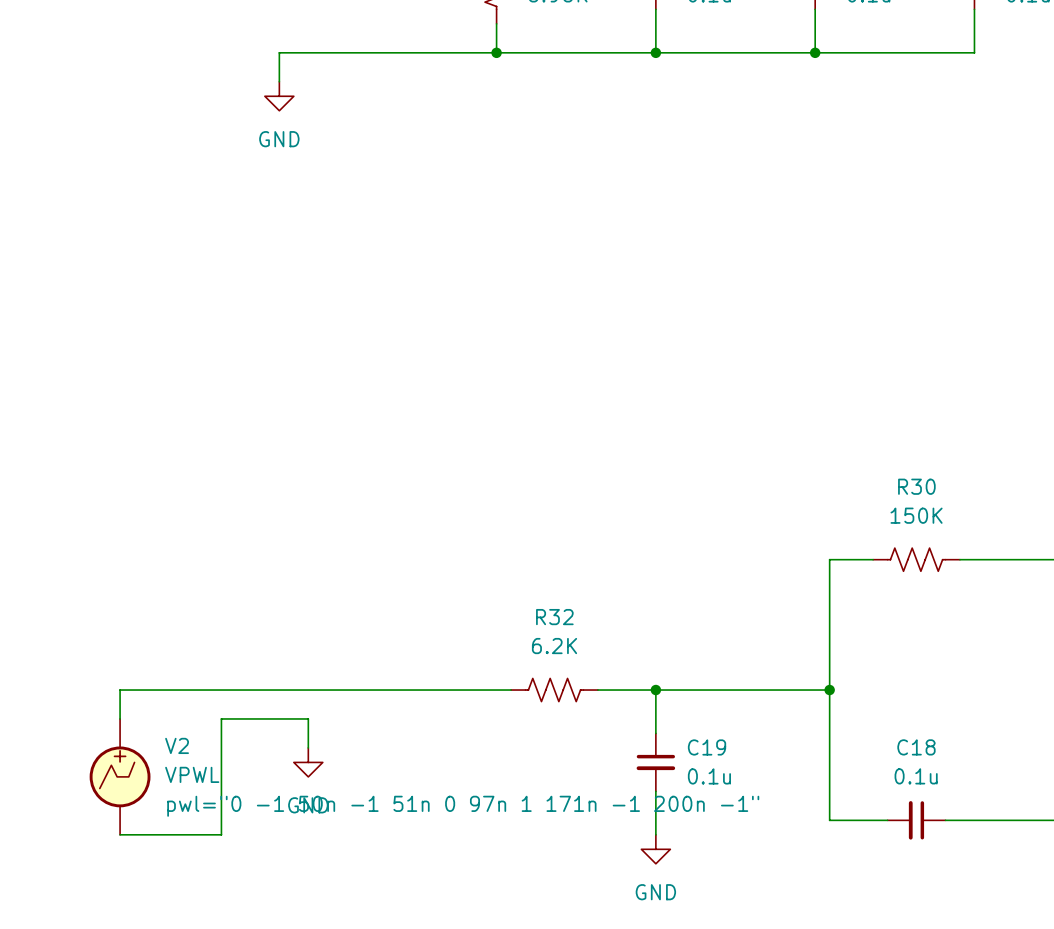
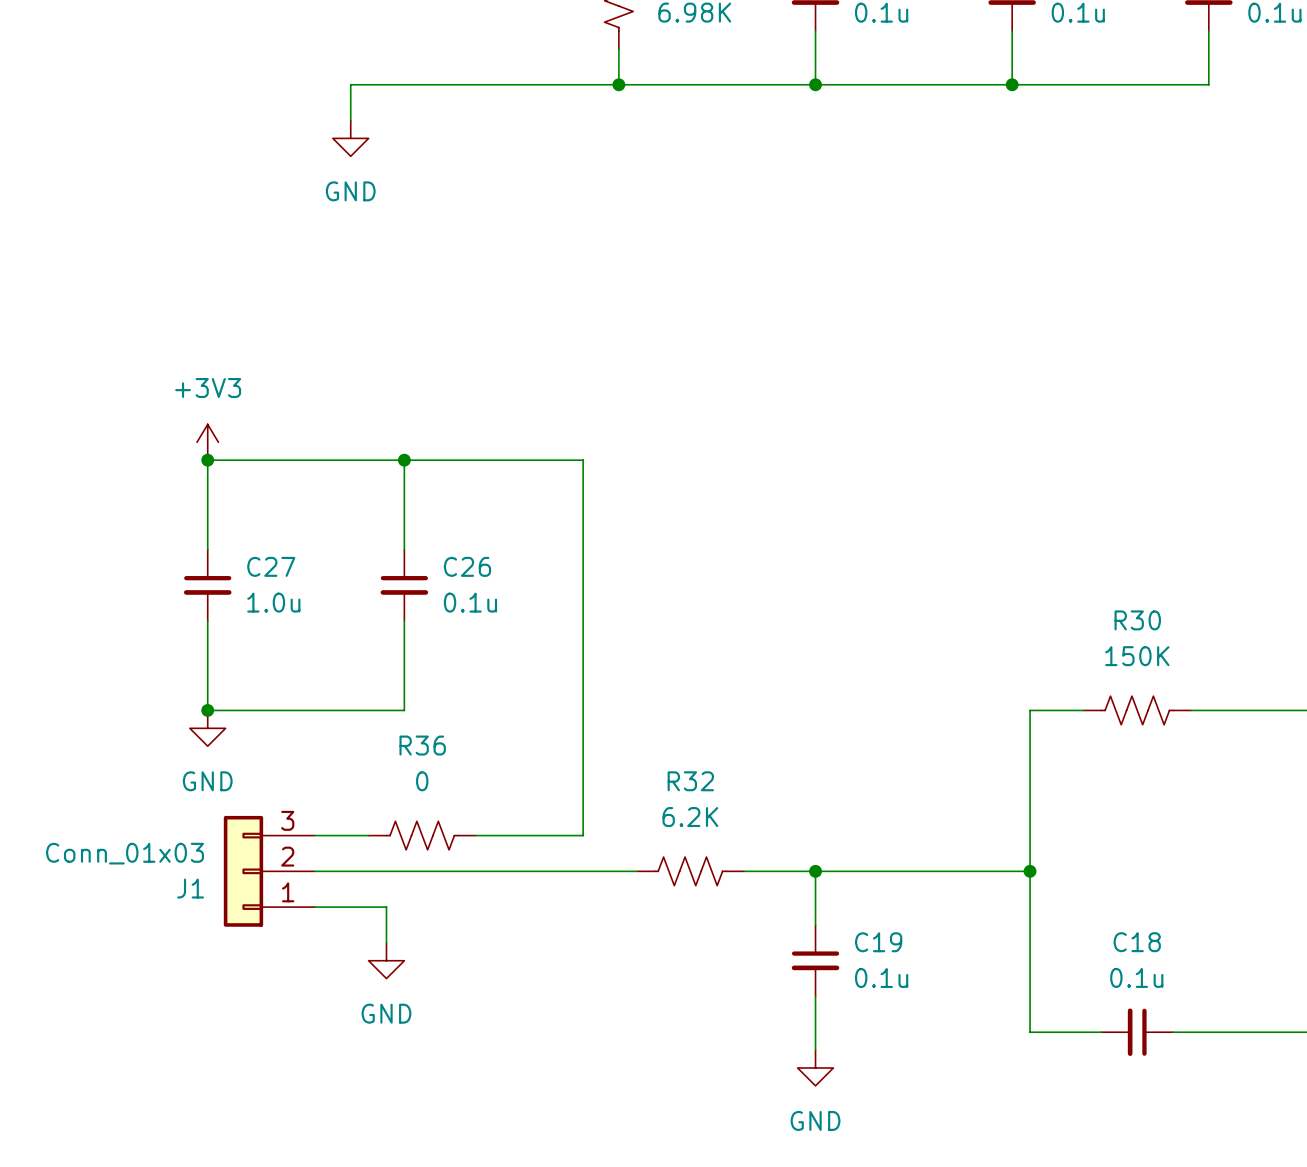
power symbol: none -> +3V3 (207, 442)
junction: none -> (207, 460)
wire: none -> (404, 460) (404, 549)
junction: none -> (404, 460)
wire: none -> (207, 549) (207, 460) (583, 460) (583, 835) (475, 835)
C27: none -> 1.0u (207, 585)
C26: none -> 0.1u (404, 585)
wire: none -> (207, 621) (207, 710) (404, 710) (404, 621)
junction: none -> (207, 710)
power symbol: none -> GND (207, 728)
wire: none -> (314, 835) (368, 835)
R36: none -> 0 (422, 835)
J1: none -> Conn_01x03 (269, 871)
wire: (250, 690) (120, 690) (120, 718) -> none
wire: (250, 718) (221, 718) (221, 834) (120, 834) -> none
V2: VPWL (120, 776) -> none

